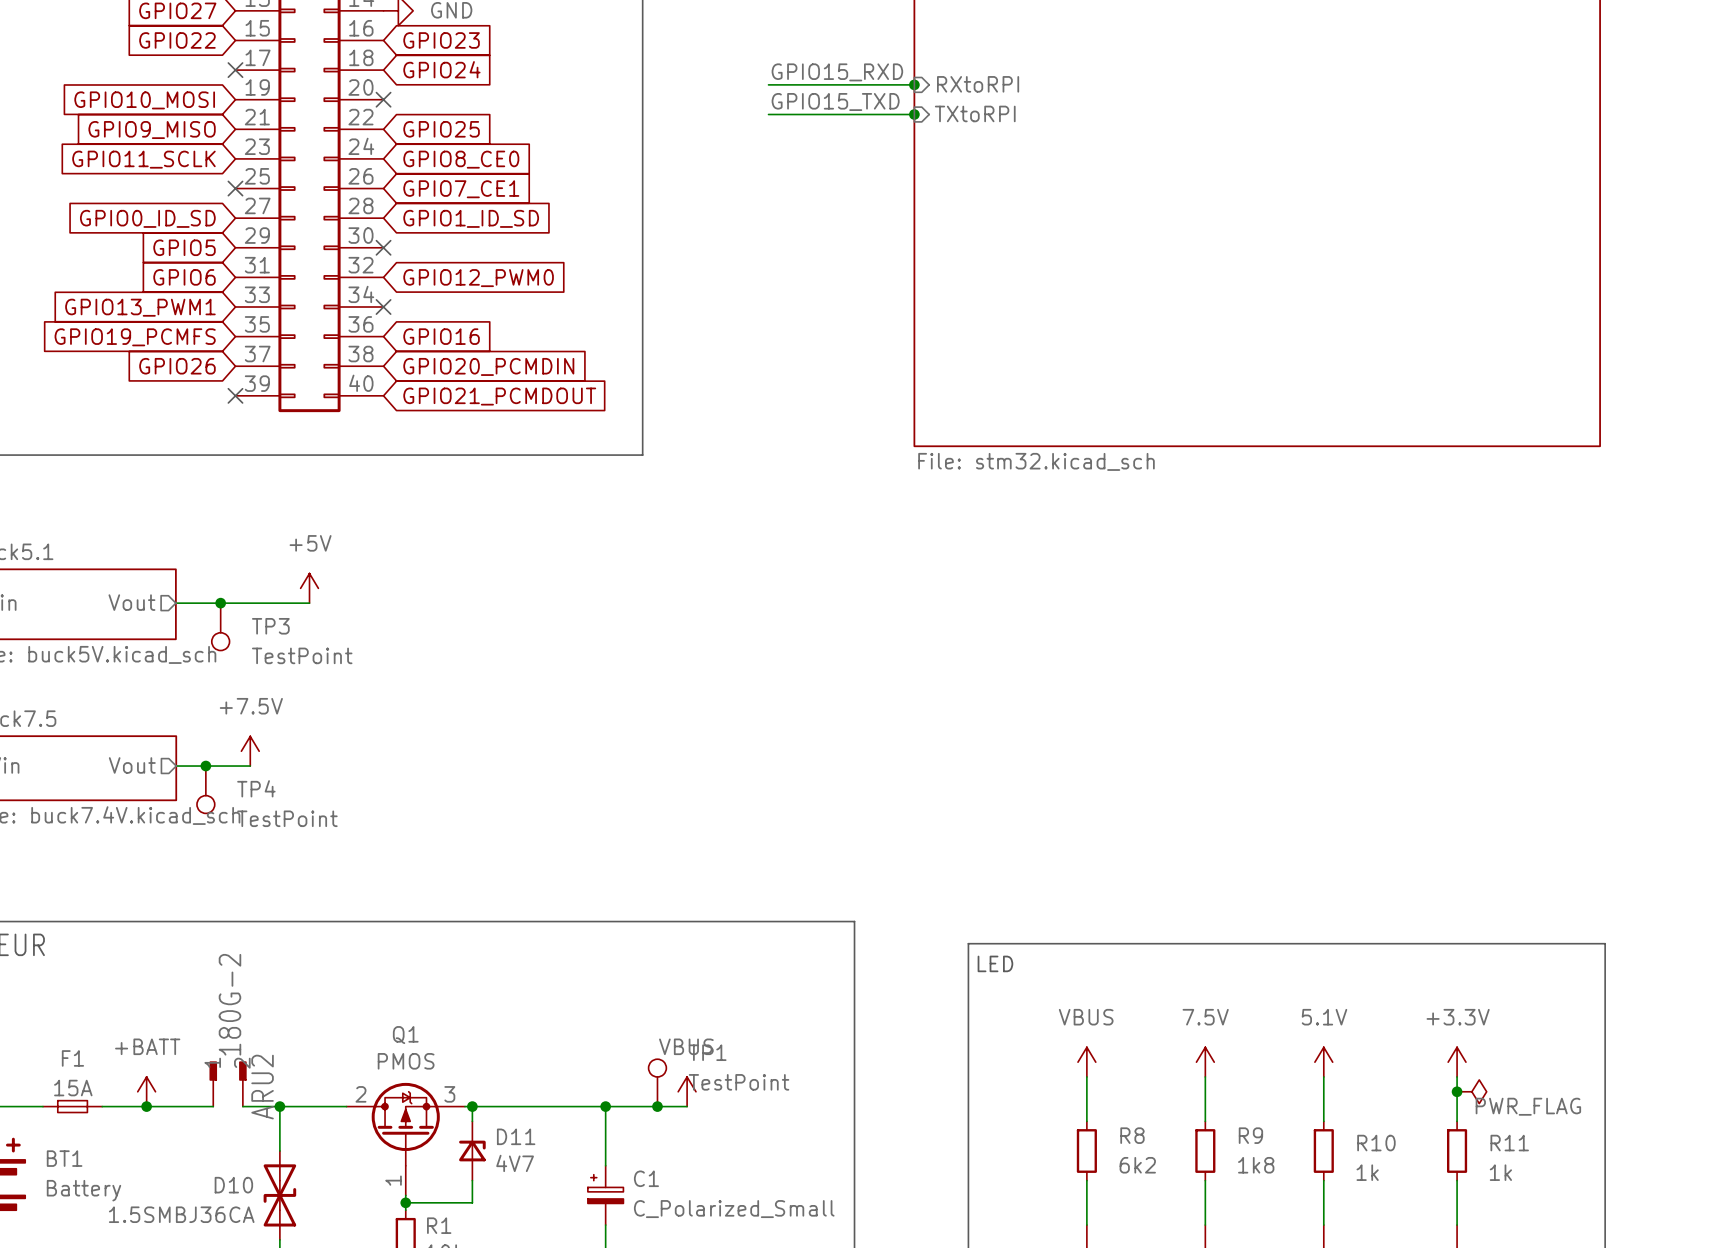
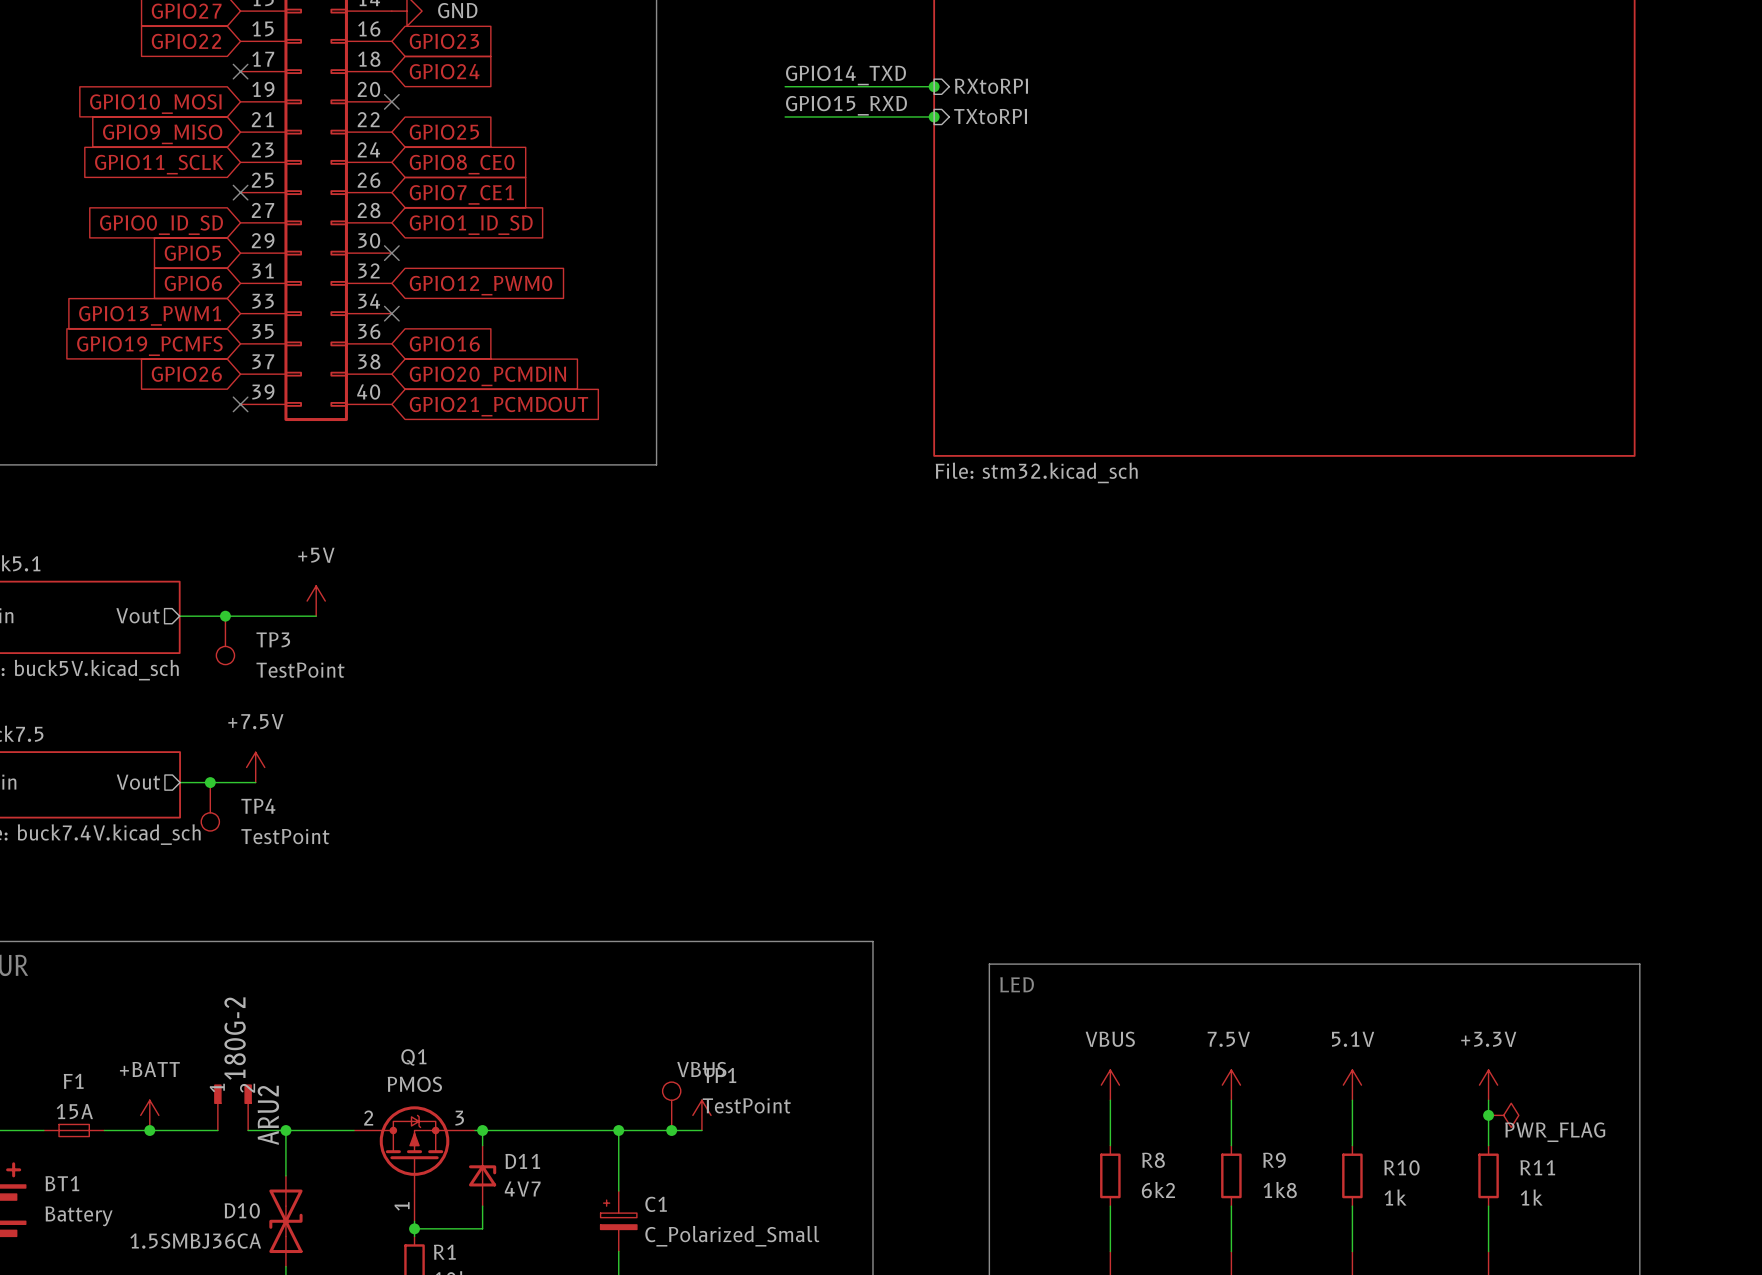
label: GPIO15_RXD (837, 72) -> GPIO14_TXD (845, 75)
label: GPIO15_TXD (835, 102) -> GPIO15_RXD (846, 105)

